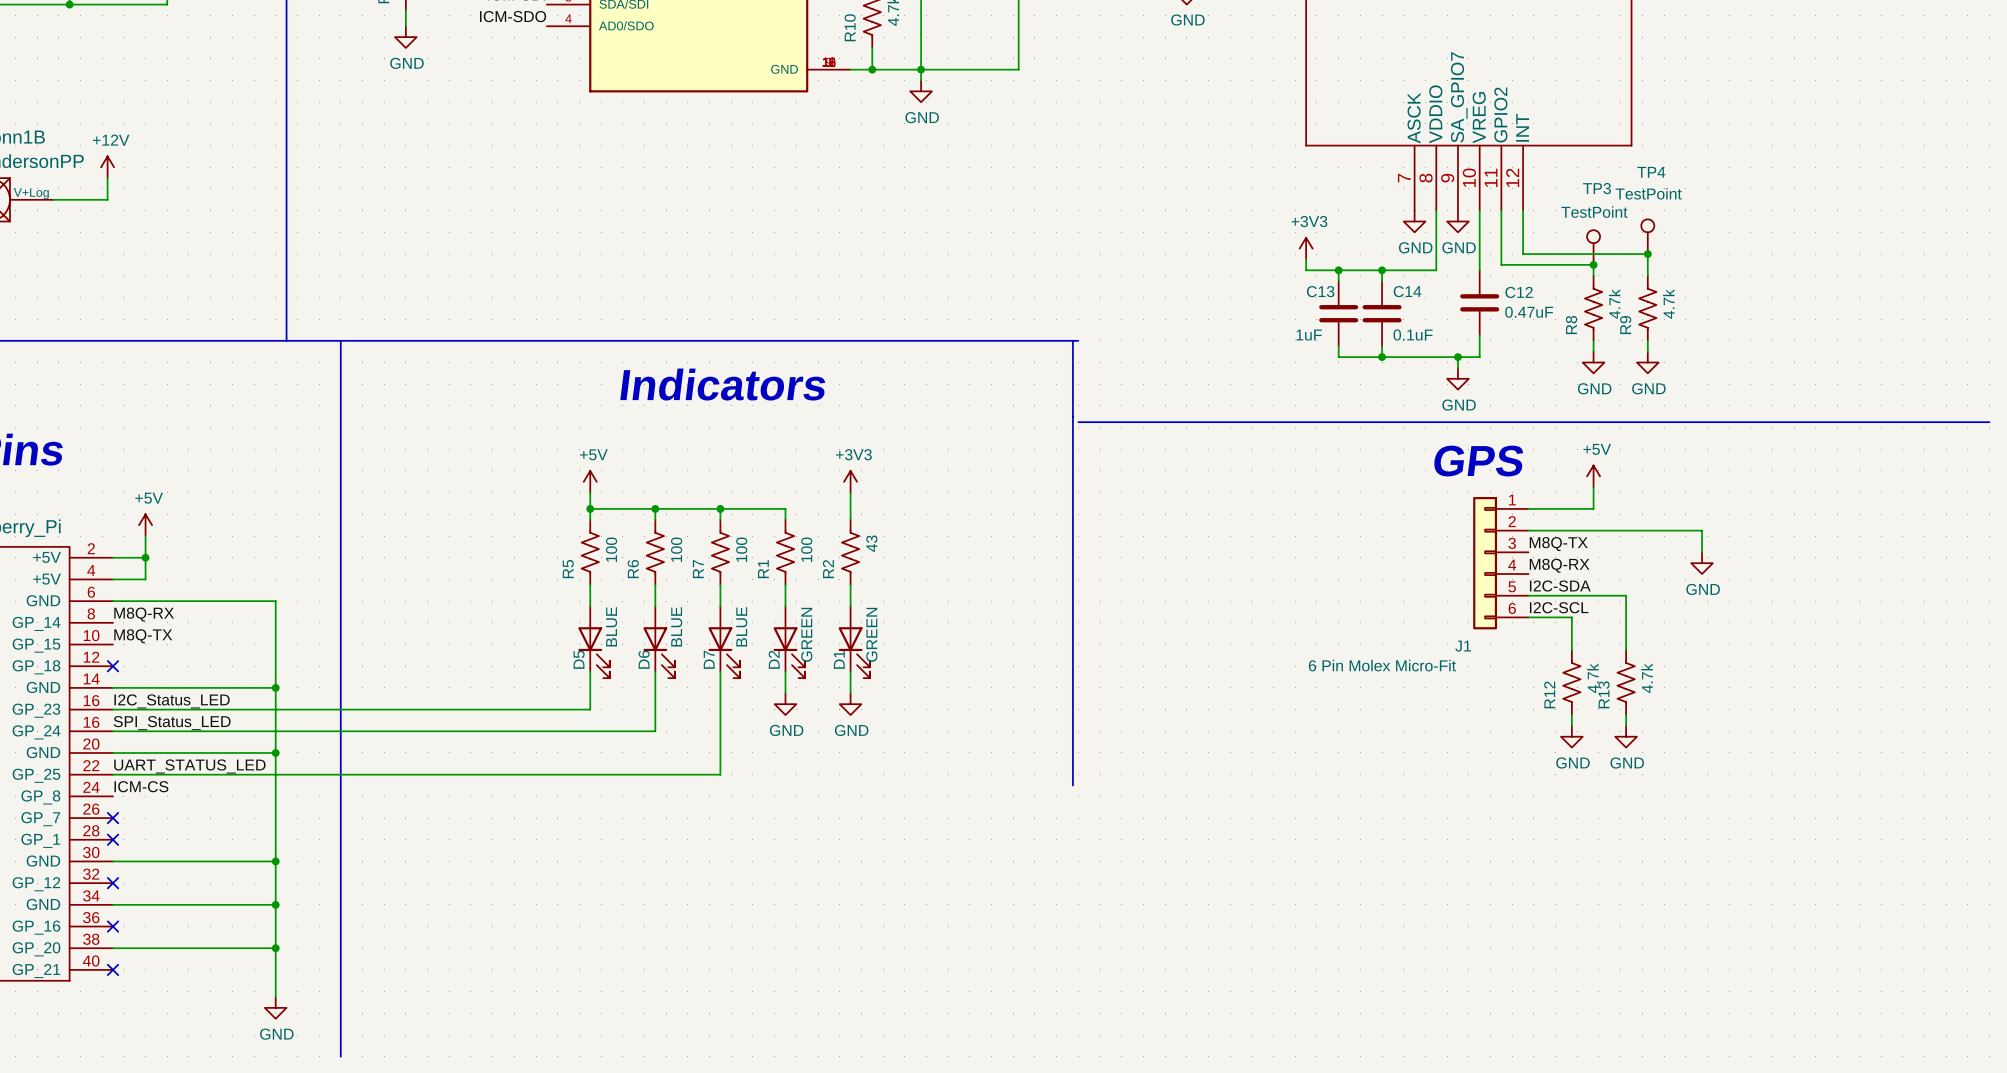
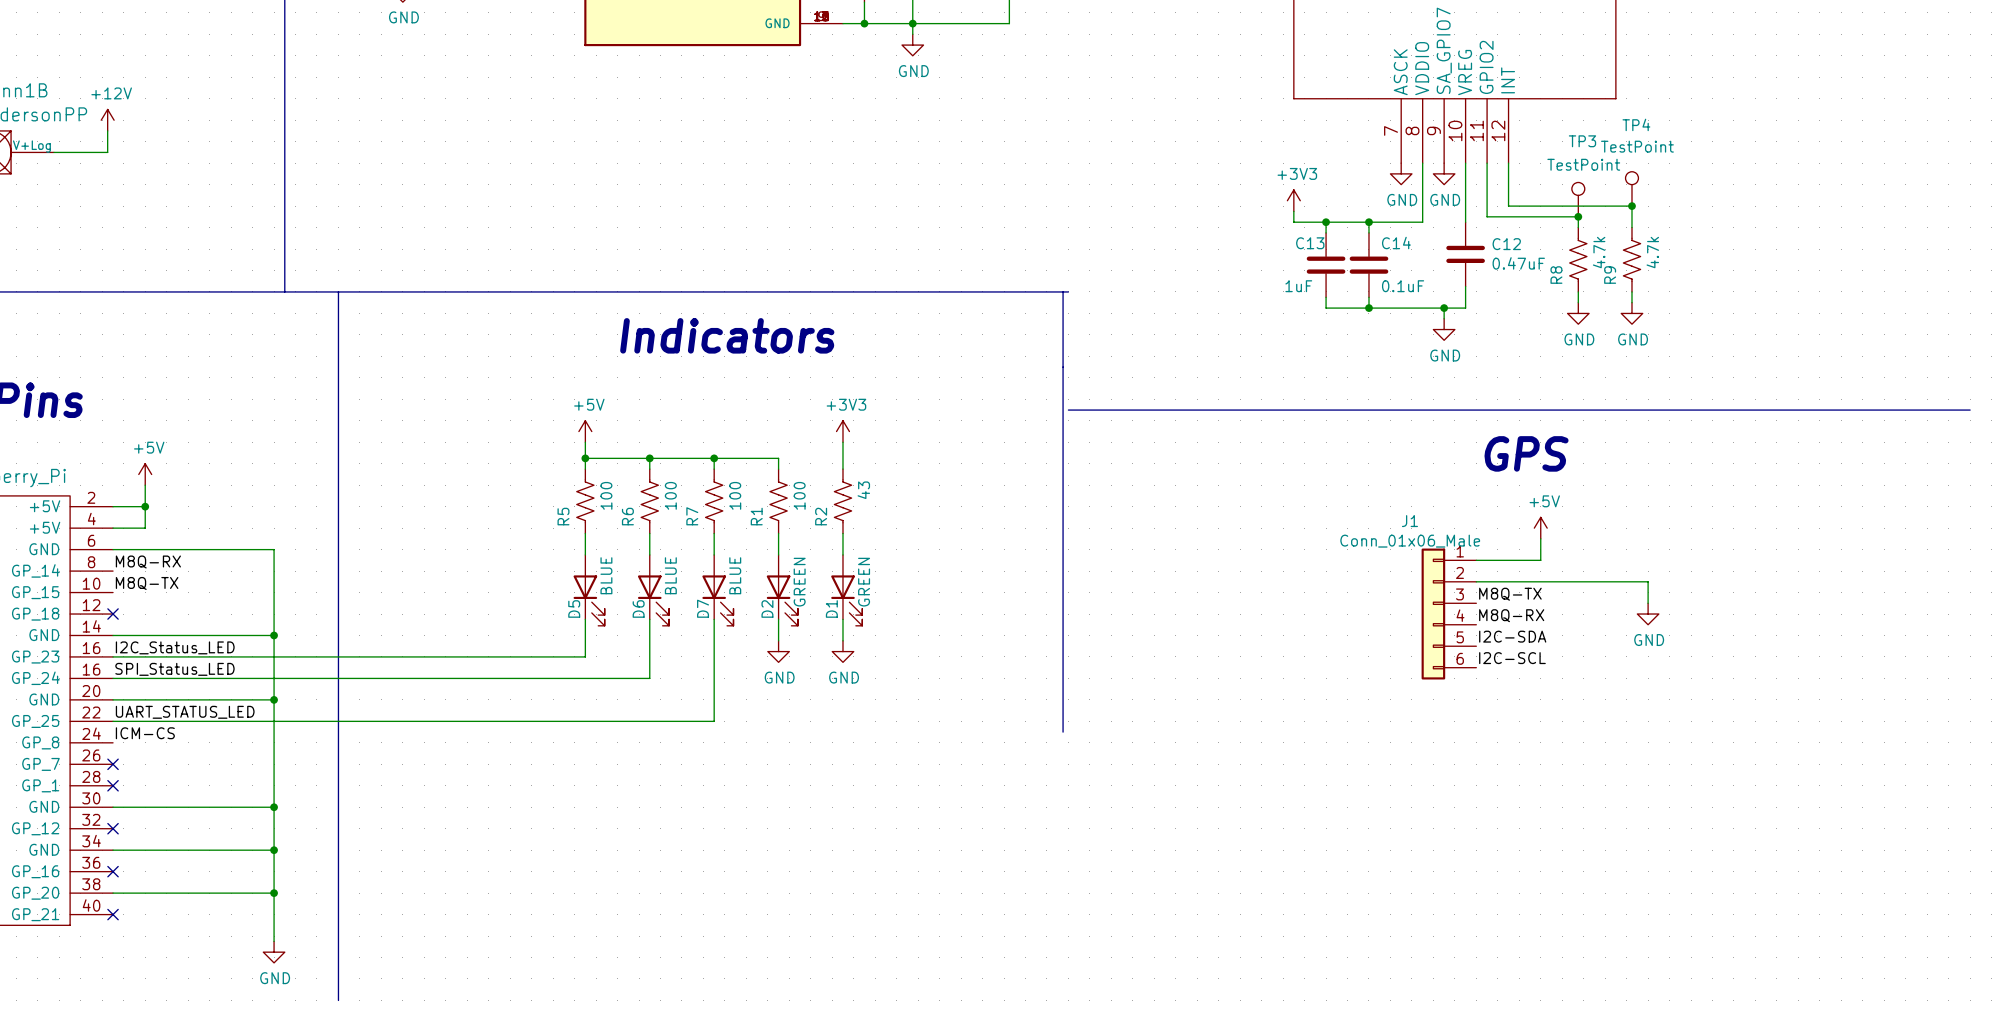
line: (1078, 422) (1989, 422) -> (1068, 410) (1970, 410)
text position: GPS (1478, 461) -> GPS (1526, 453)
power symbol position: +5V (1593, 476) -> +5V (1540, 528)
wire: (1593, 487) (1593, 508) (1528, 508) -> (1540, 538) (1540, 560) (1476, 560)
wire: (1528, 530) (1702, 530) (1702, 552) -> (1476, 581) (1648, 581) (1648, 603)
label position: M8Q-TX (1558, 544) -> M8Q-TX (1510, 594)
J1 position: (1500, 563) -> (1448, 614)
power symbol: GND (1702, 563) -> none
label position: M8Q-RX (1559, 565) -> M8Q-RX (1511, 615)
label position: I2C-SDA (1560, 586) -> I2C-SDA (1512, 636)
wire: (1528, 595) (1626, 595) (1626, 649) -> none
label position: I2C-SCL (1559, 607) -> I2C-SCL (1512, 658)
wire: (1528, 617) (1571, 617) (1571, 649) -> none
J1 name position: J1 (1463, 646) -> J1 (1409, 521)
J1 value: 6 Pin Molex Micro-Fit (1382, 665) -> Conn_01x06_Male (1410, 541)
power symbol: none -> GND (1648, 614)
R12: 4.7k (1571, 682) -> none
R13: 4.7k (1626, 682) -> none
wire: (1571, 715) (1571, 725) -> none
wire: (1626, 715) (1626, 725) -> none
power symbol: GND (1571, 736) -> none
power symbol: GND (1626, 736) -> none

